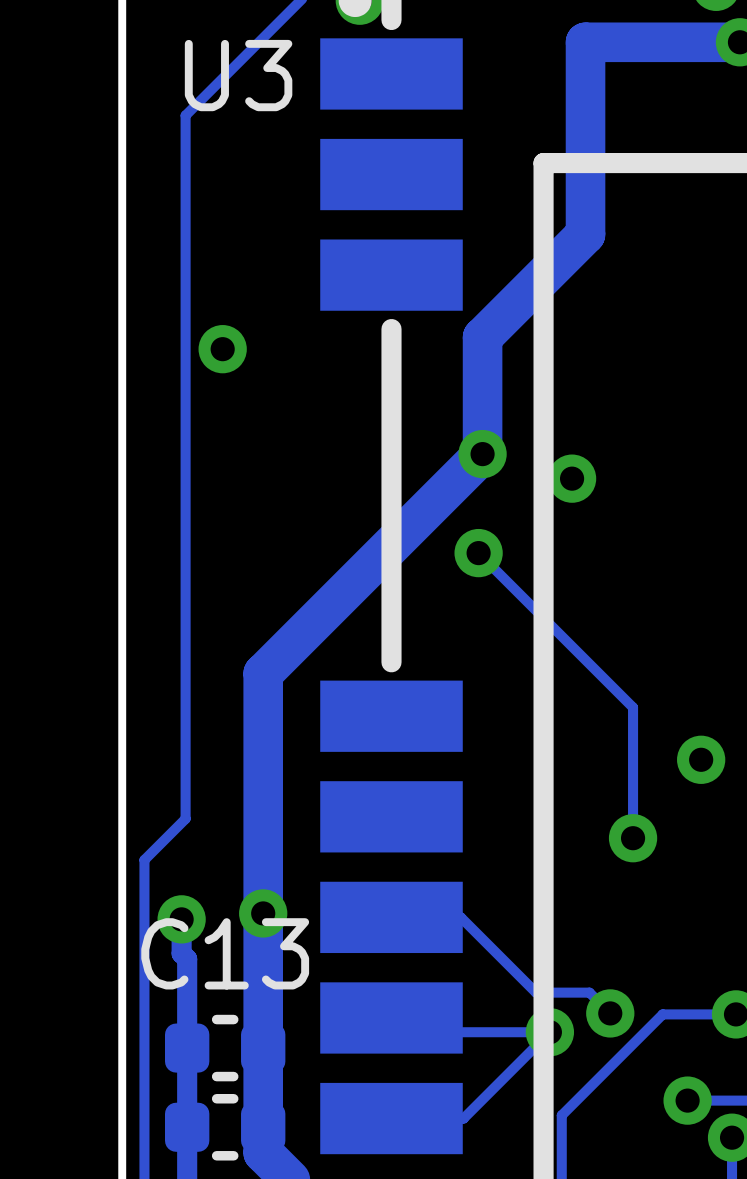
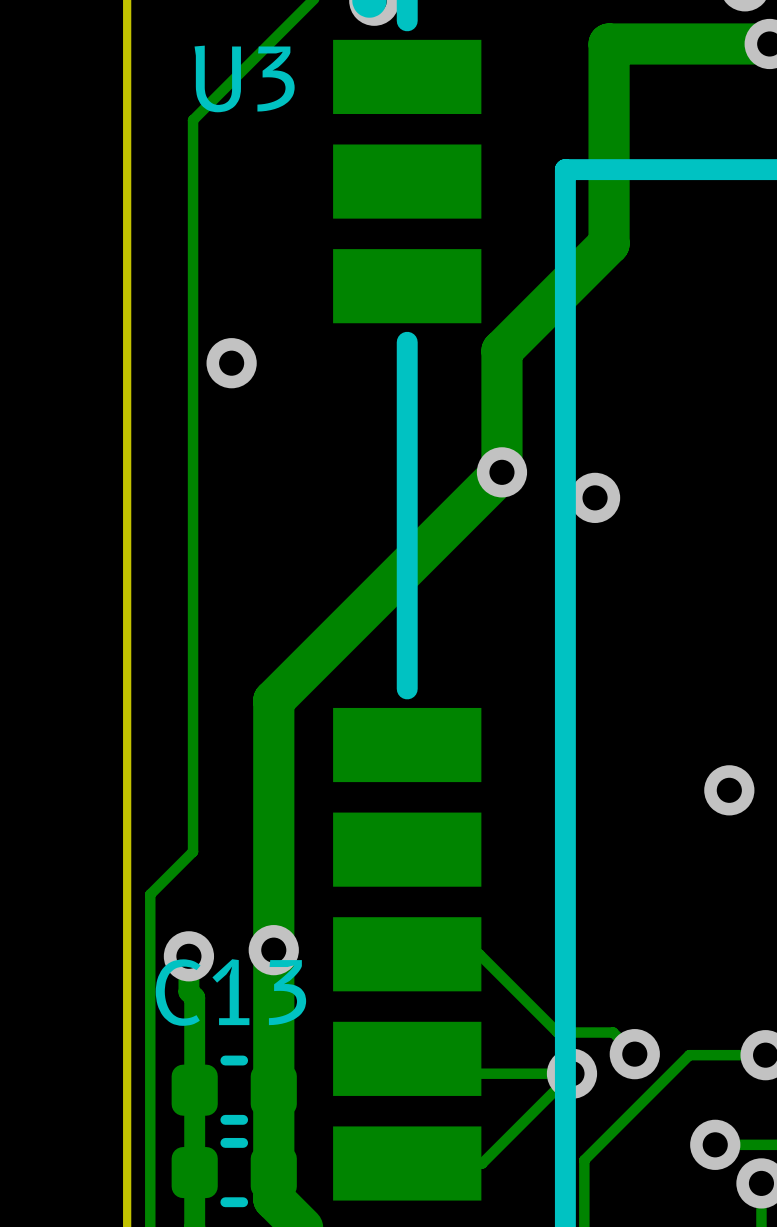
track: (478, 553) (633, 707) (633, 838) -> none
via: (478, 553) -> none
via: (633, 838) -> none

